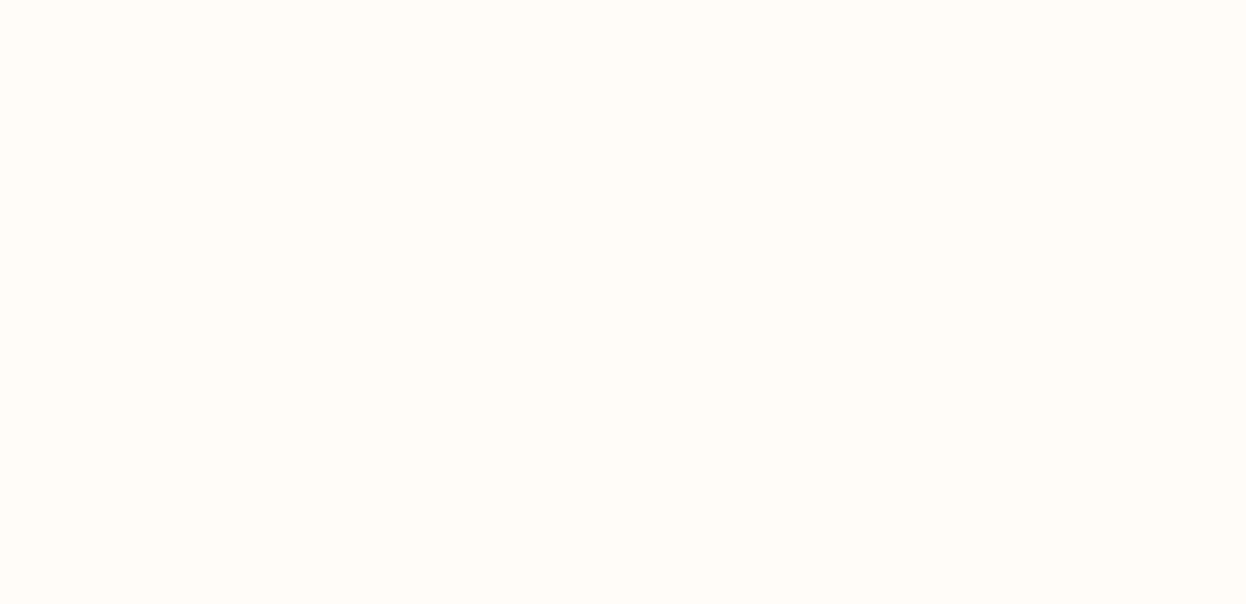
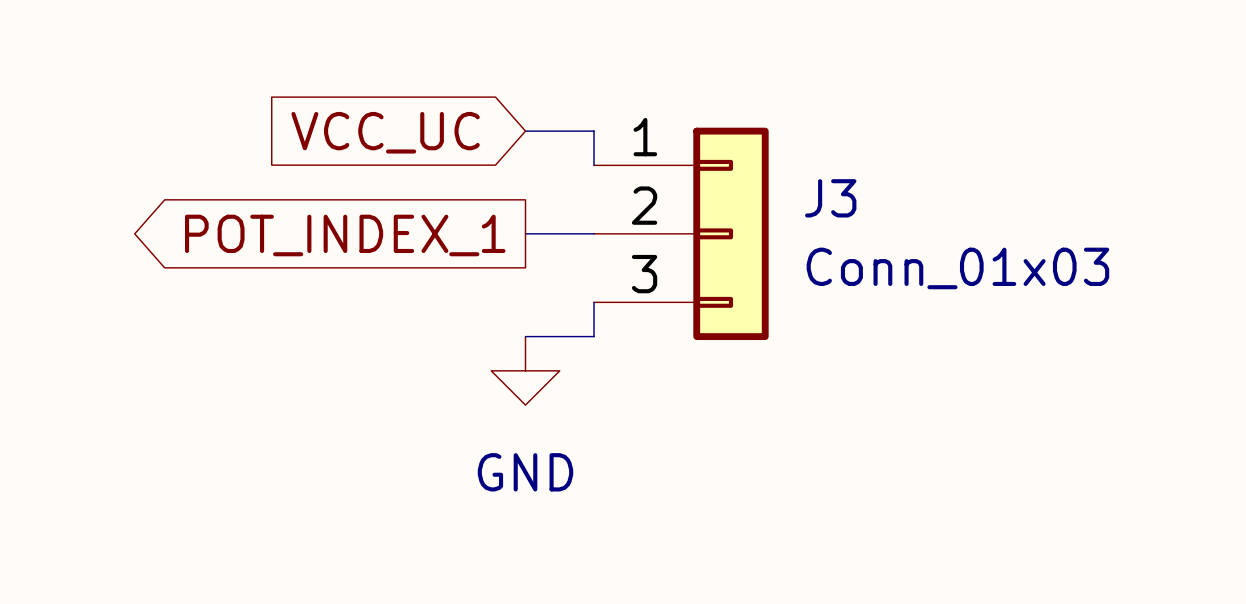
wire: none -> (525, 131) (593, 131) (593, 165)
global label: none -> VCC_UC (385, 132)
wire: none -> (525, 233) (593, 233)
J3: none -> Conn_01x03 (681, 233)
global label: none -> POT_INDEX_1 (345, 235)
wire: none -> (593, 302) (593, 336) (525, 336)
power symbol: none -> GND (525, 370)

